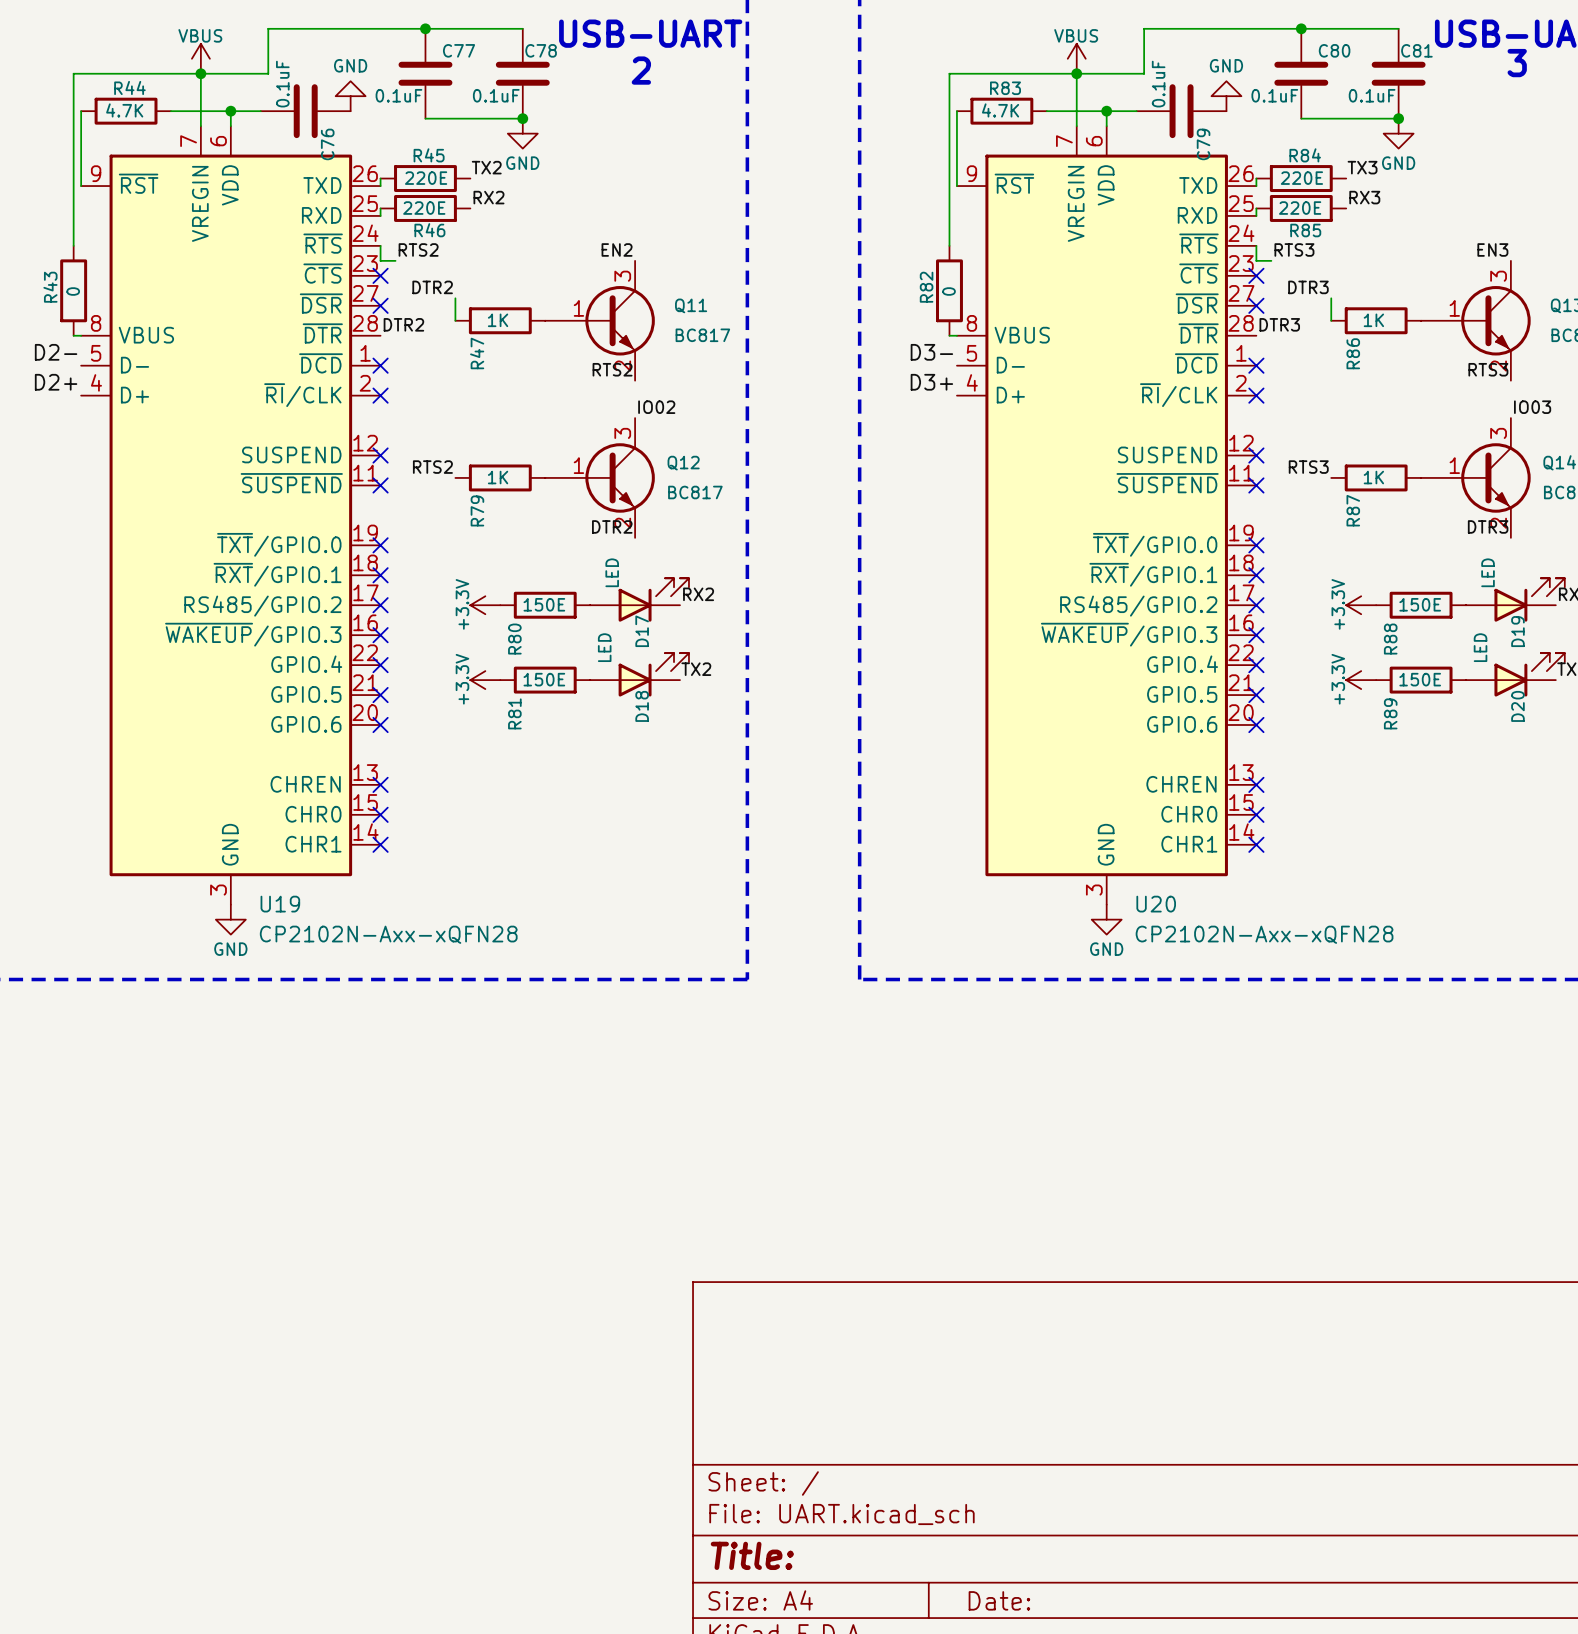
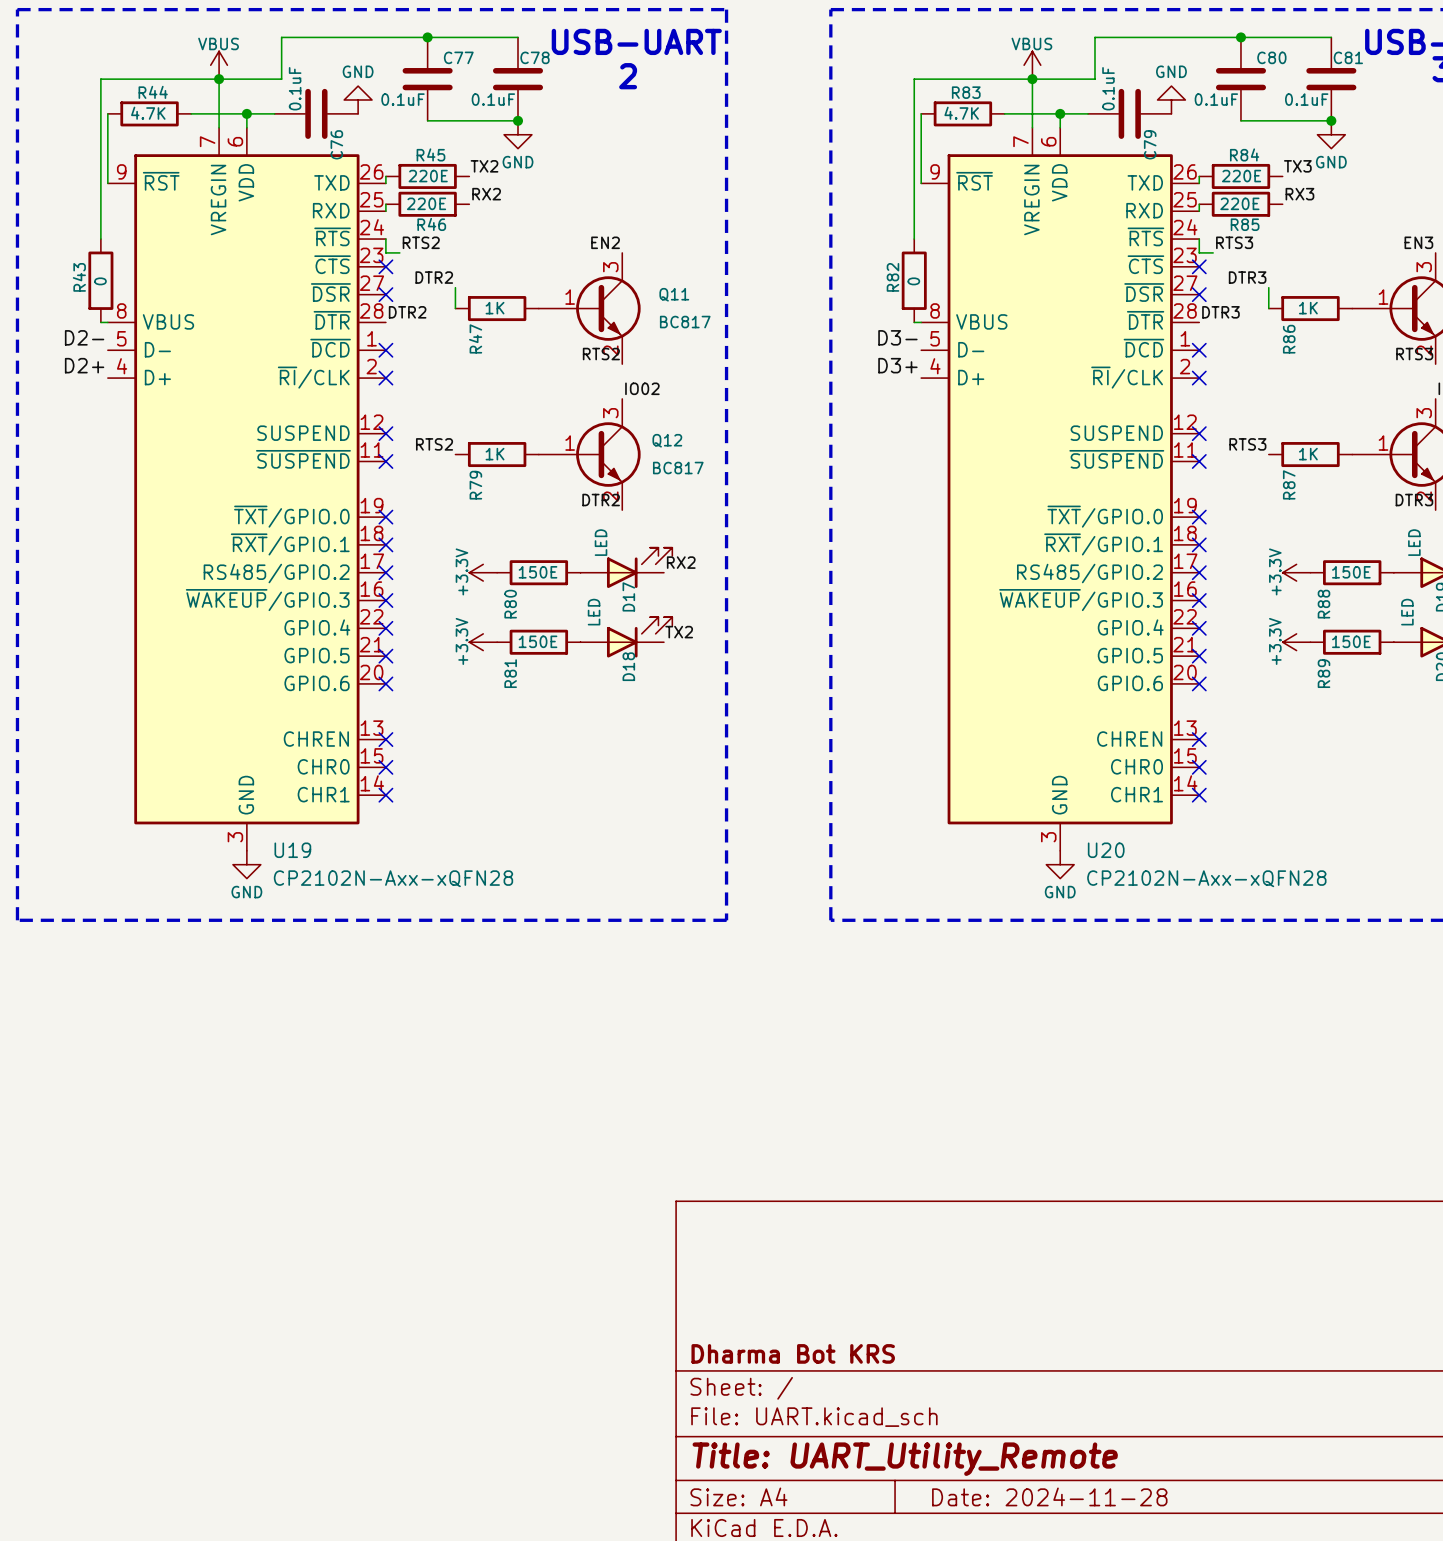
title block: none -> Dharma Bot KRS (793, 1353)
title block: Title: (752, 1555) -> Title: UART_Utility_Remote (905, 1459)
title block: Date: (999, 1600) -> Date: 2024-11-28 (1049, 1496)

